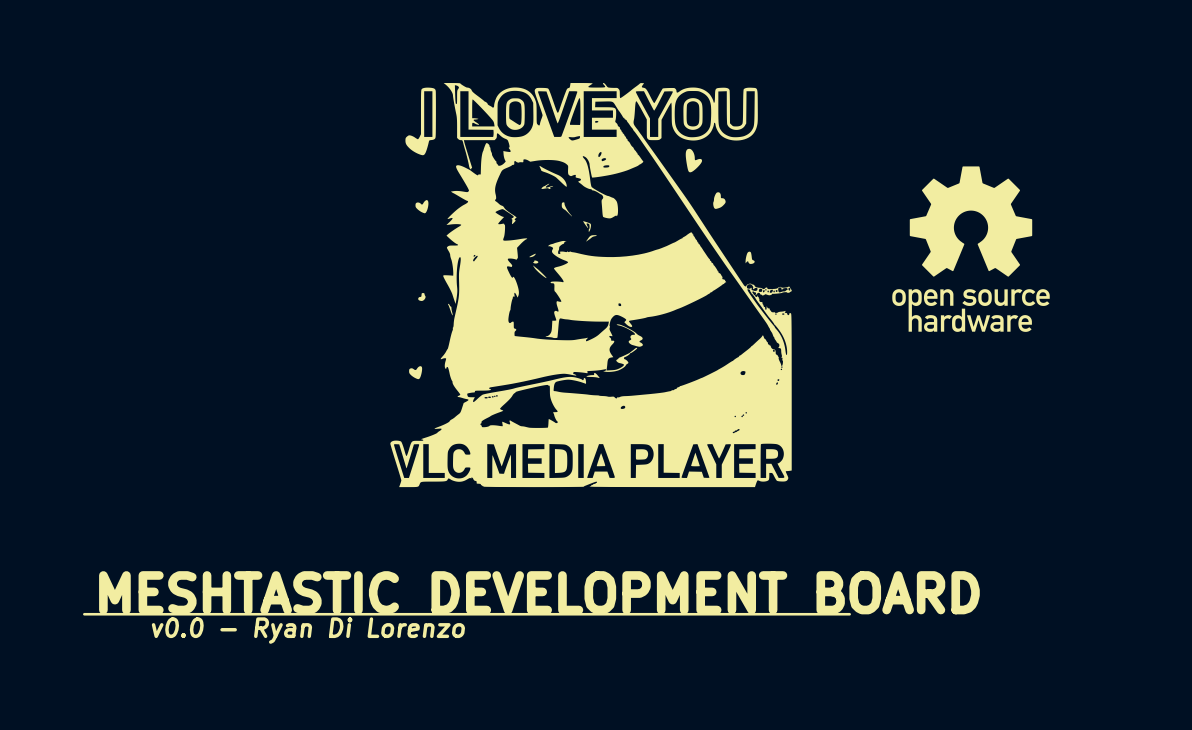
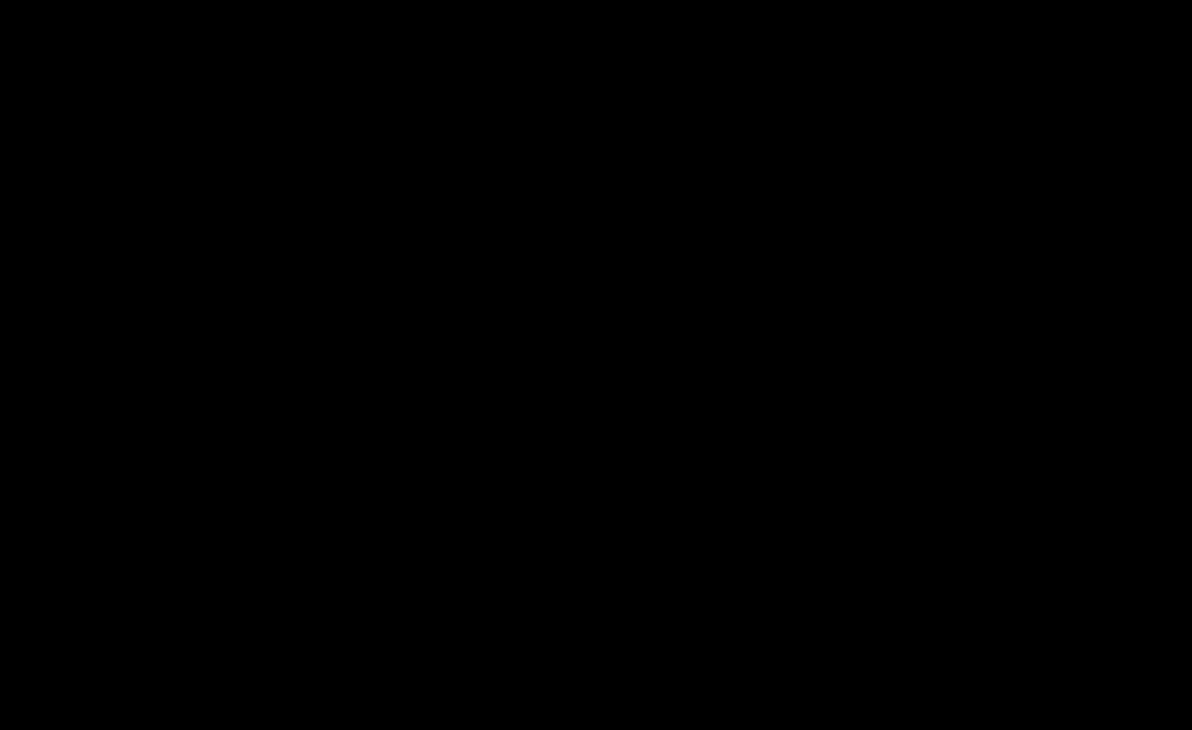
drawing: [390, 83, 792, 488] -> none
drawing: [892, 166, 1050, 332] -> none
text: MESHTASTIC DEVELOPMENT BOARD (539, 592) -> none
line: (849, 614) (84, 614) -> none
text: v0.0 - Ryan Di Lorenzo (308, 630) -> none

